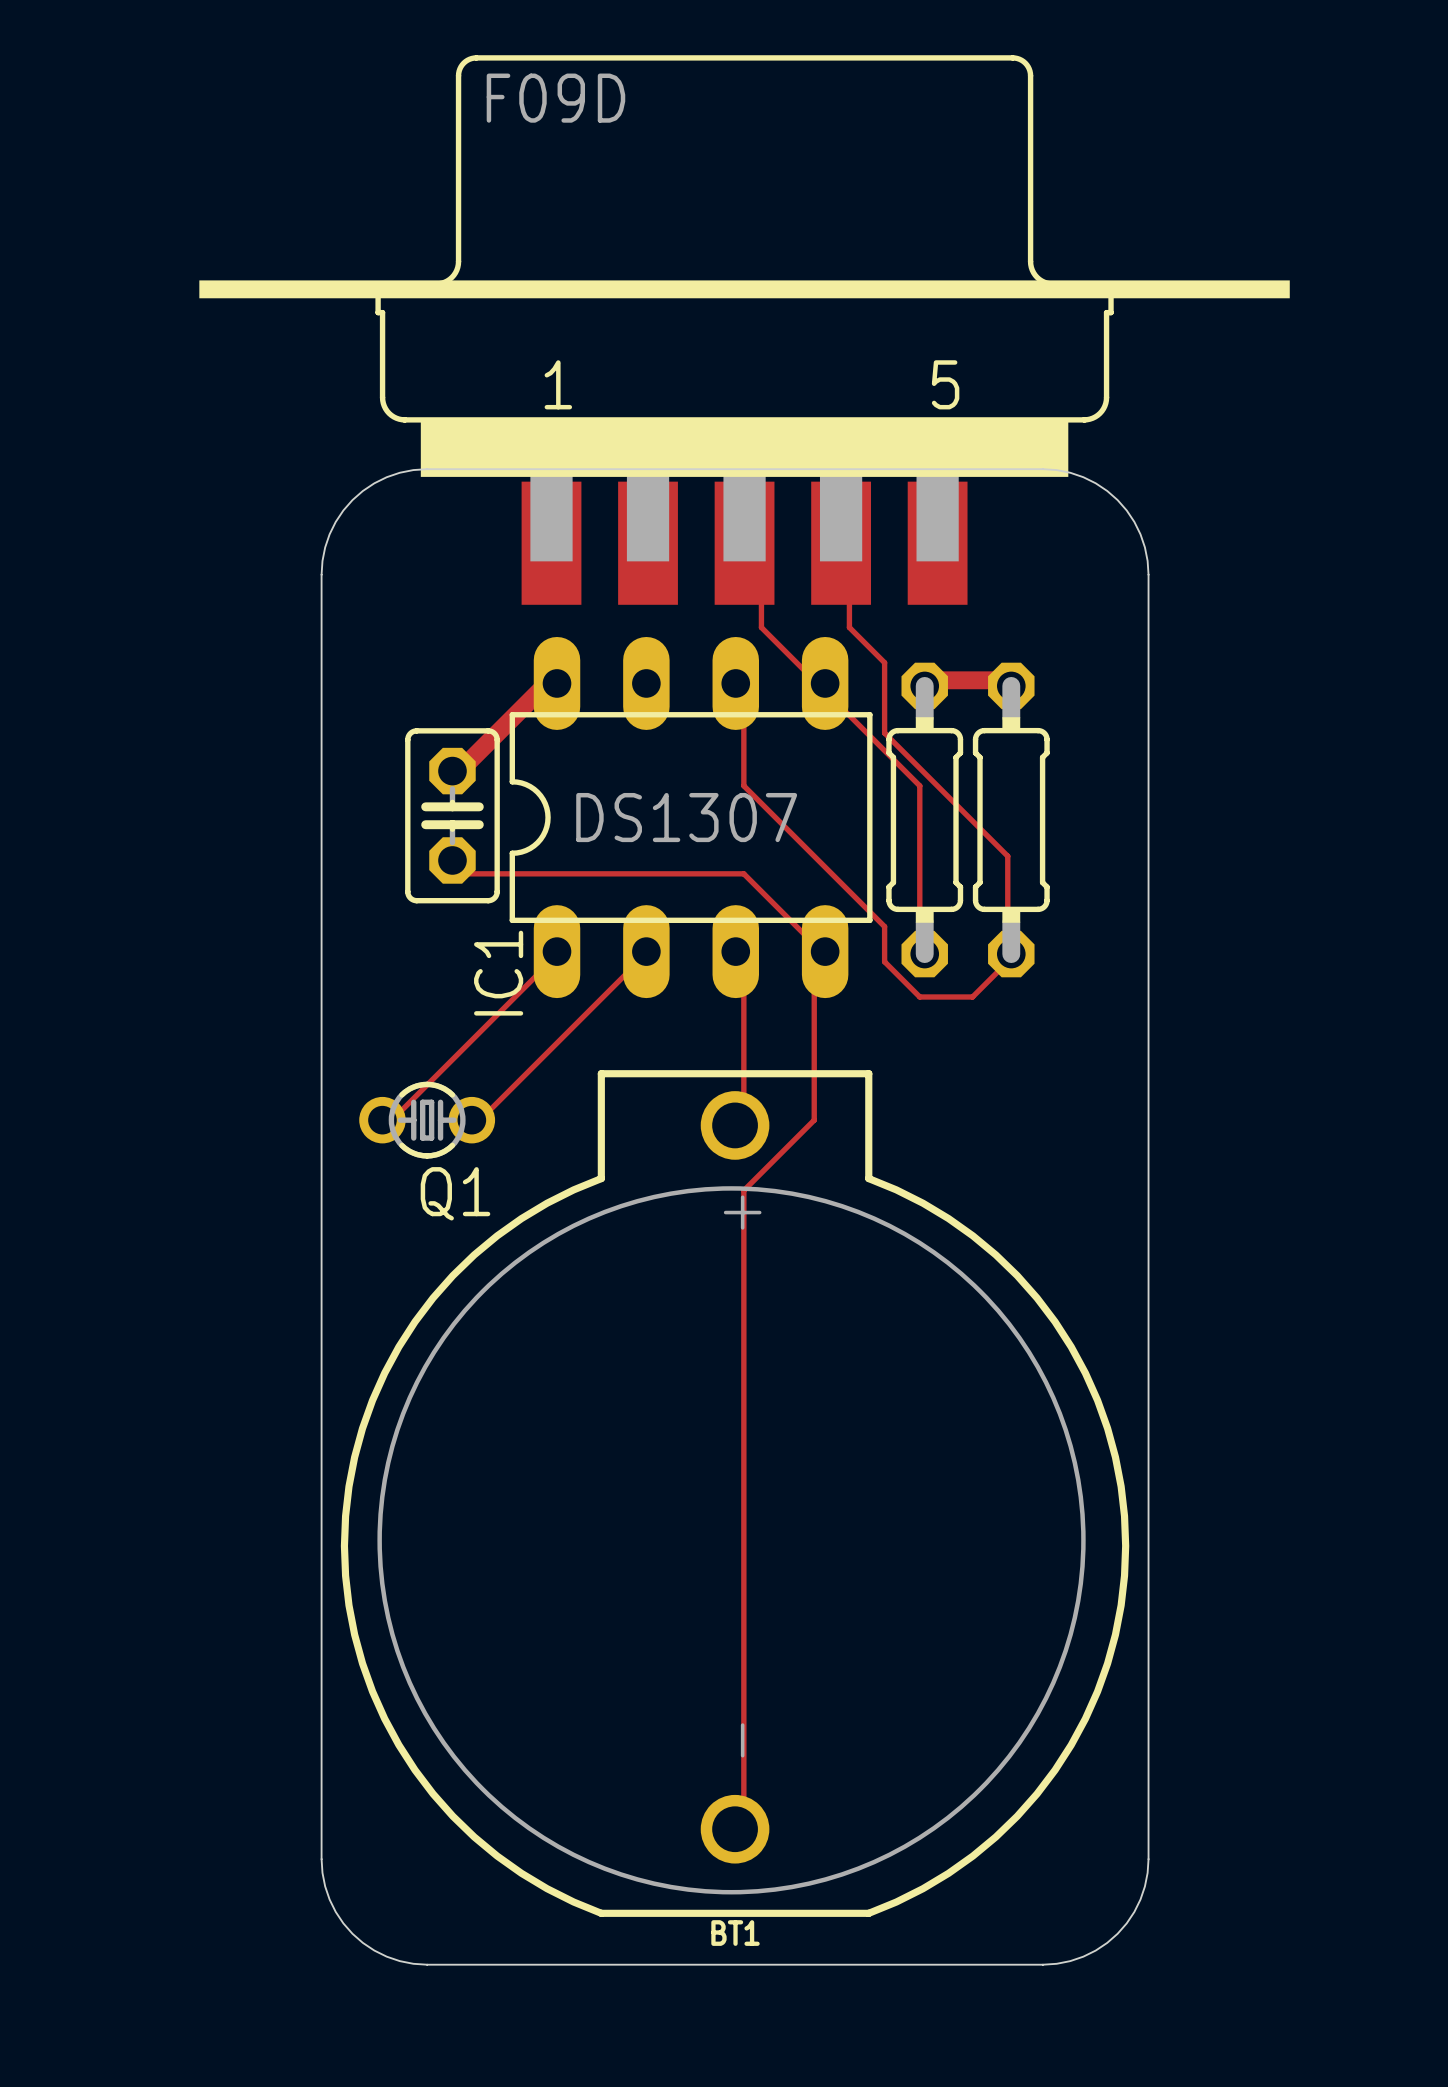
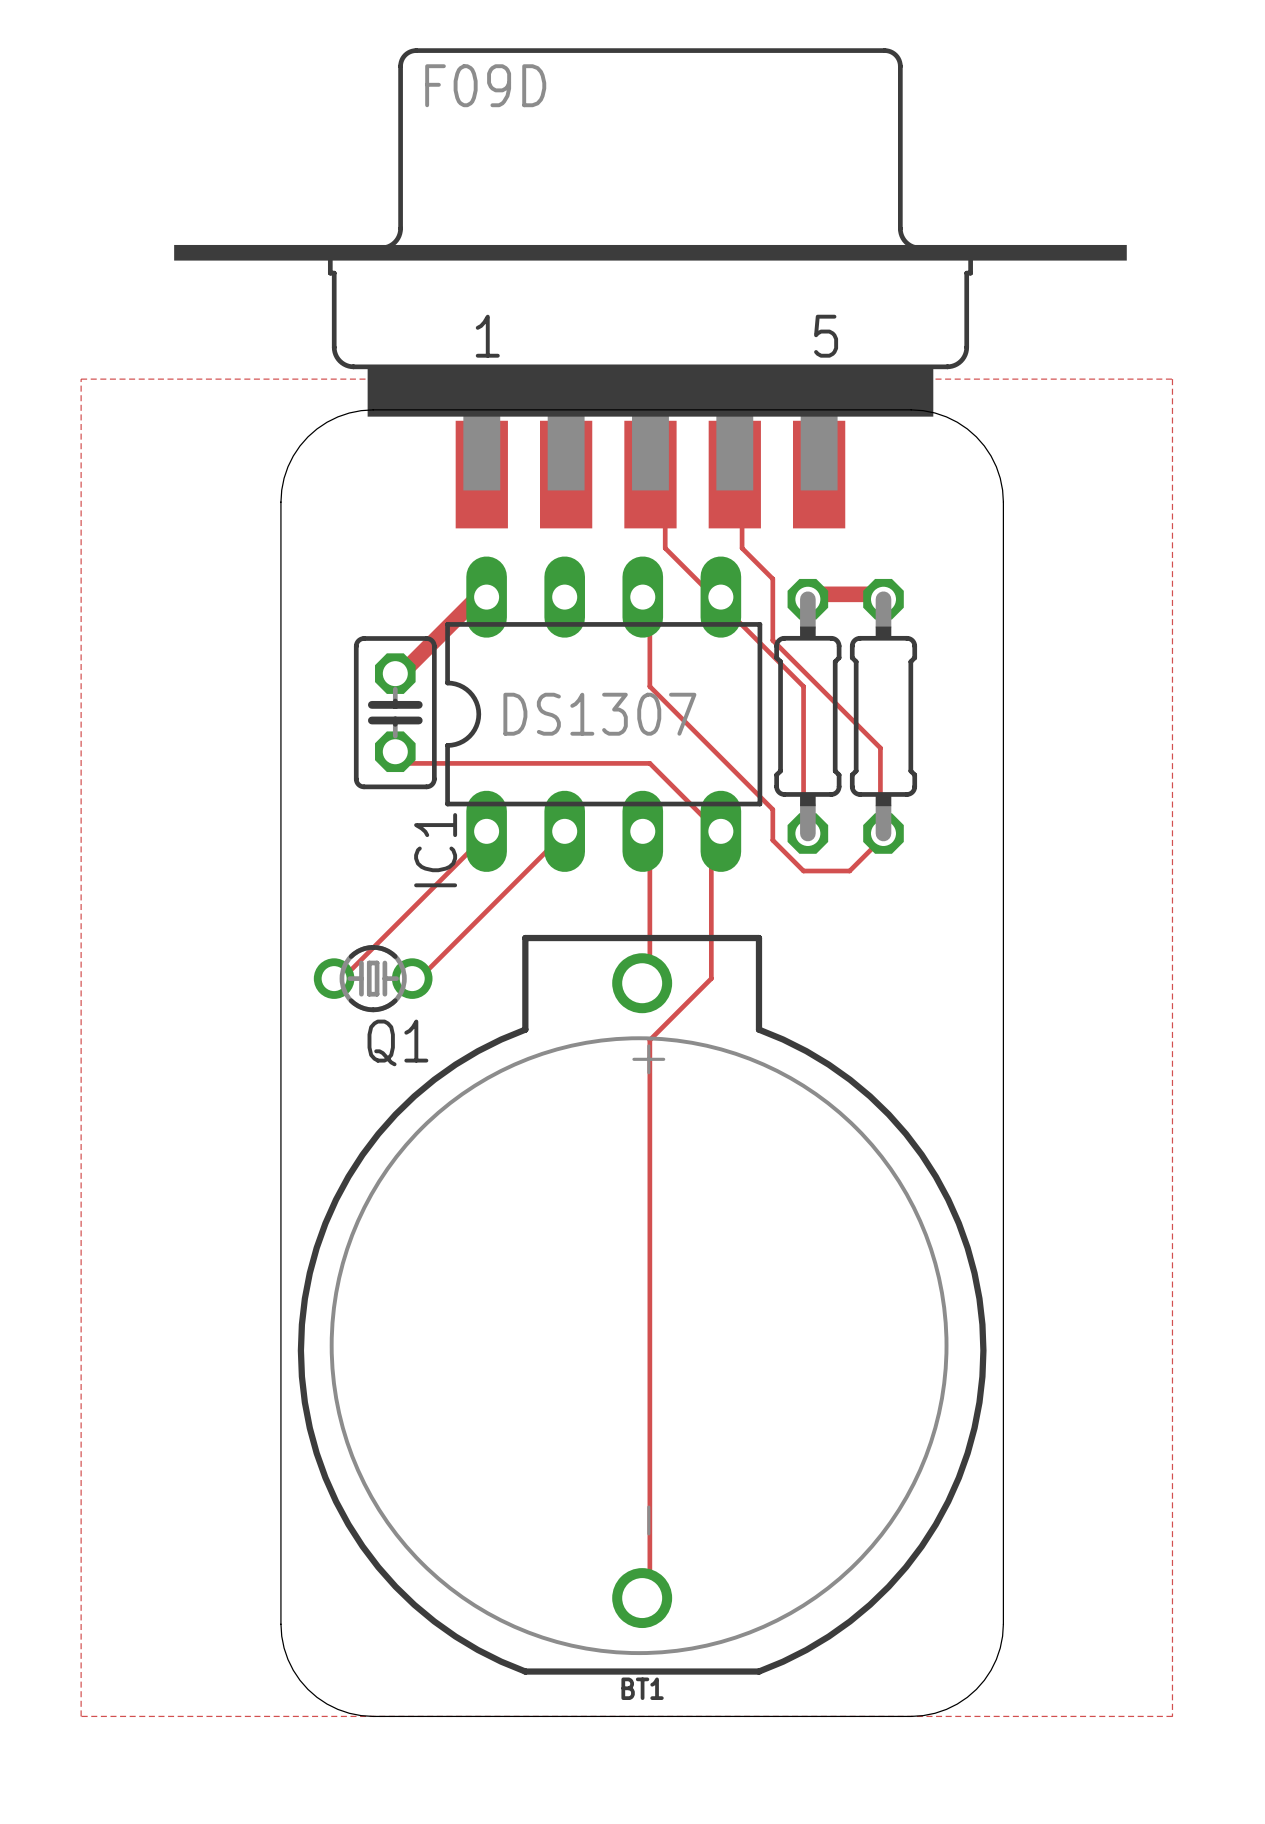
zone outline: none -> (81, 379) (1172, 379) (1172, 1716) (81, 1716) (81, 379)

